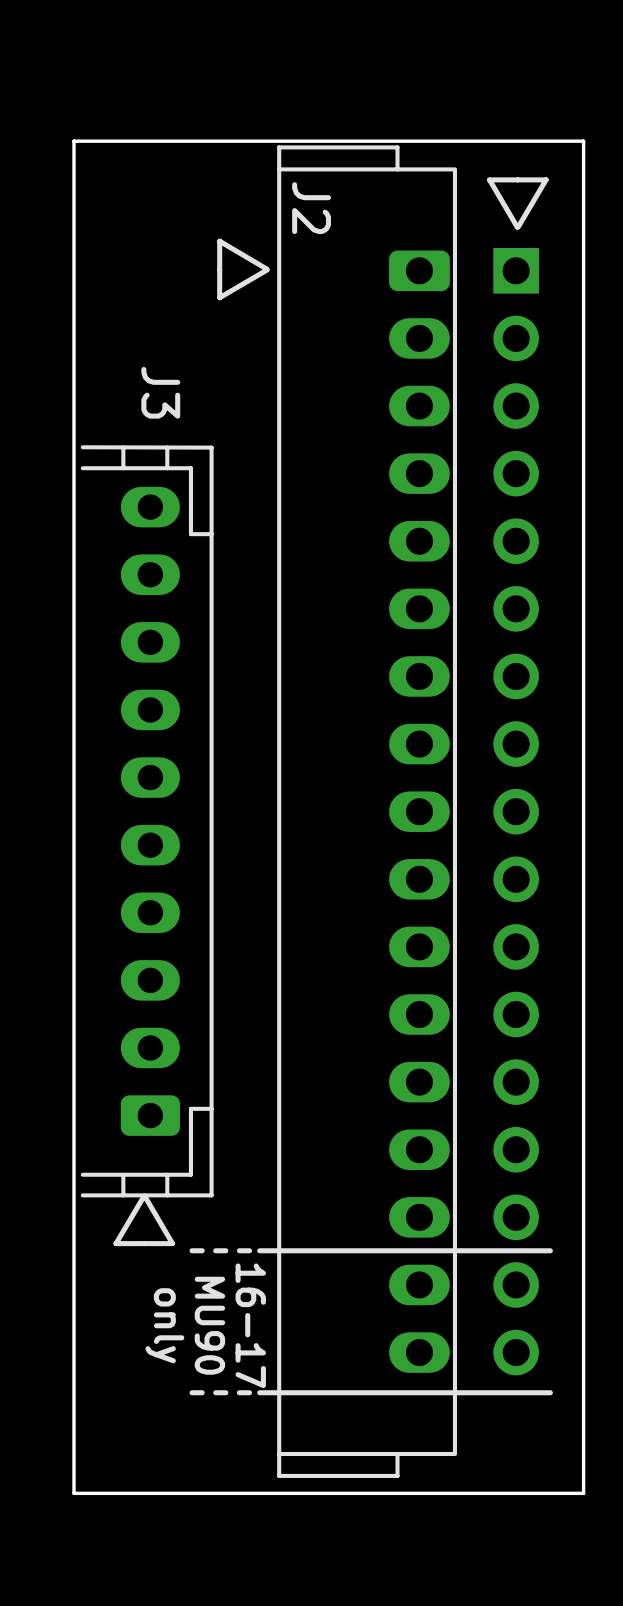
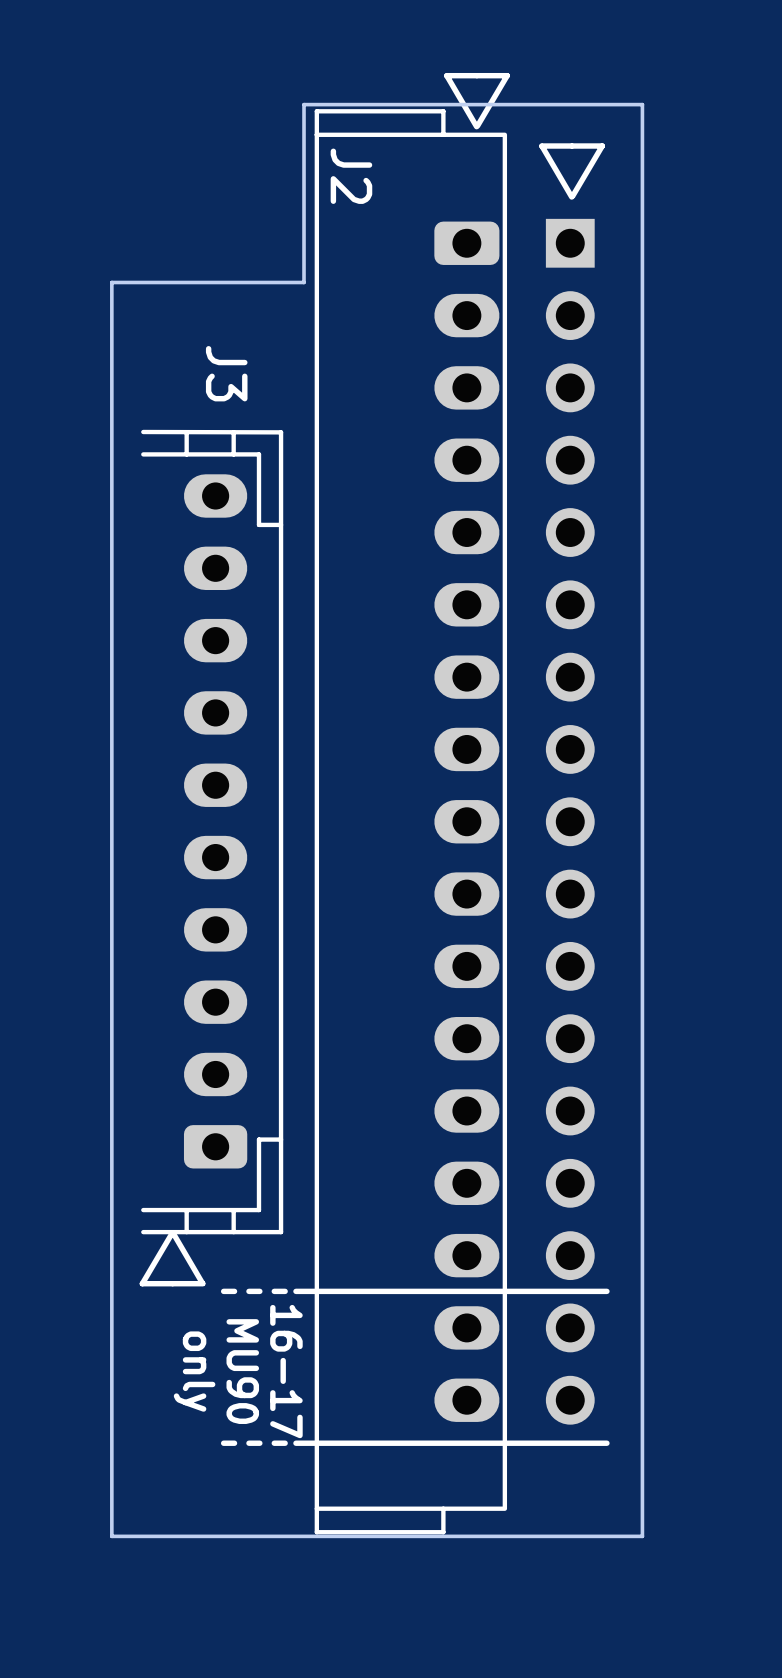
line: none -> (447, 76) (476, 126)
line: none -> (476, 75) (446, 75)
line: none -> (477, 75) (507, 75) (477, 125)
board edge: (267, 141) (73, 141) (73, 1493) (583, 1493) (583, 1479) -> (304, 104) (304, 282) (111, 282) (111, 1536) (642, 1536)
line: (266, 268) (219, 241) (219, 269) -> none
line: (219, 269) (219, 297) -> none
line: (267, 269) (220, 297) -> none
J3 position: (147, 821) -> (212, 832)

